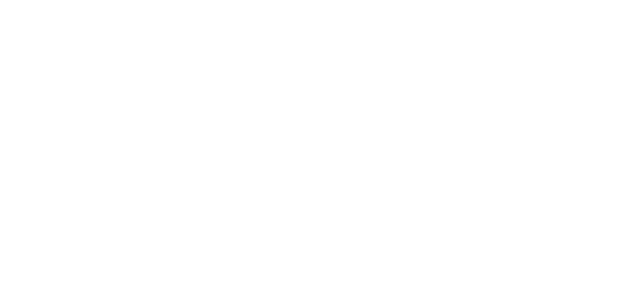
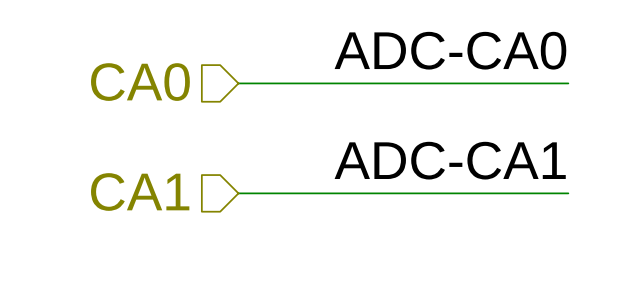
label: none -> ADC-CA0 (450, 50)
hierarchical label: none -> CA0 (140, 82)
wire: none -> (238, 83) (568, 83)
label: none -> ADC-CA1 (450, 160)
hierarchical label: none -> CA1 (140, 192)
wire: none -> (238, 193) (568, 193)

